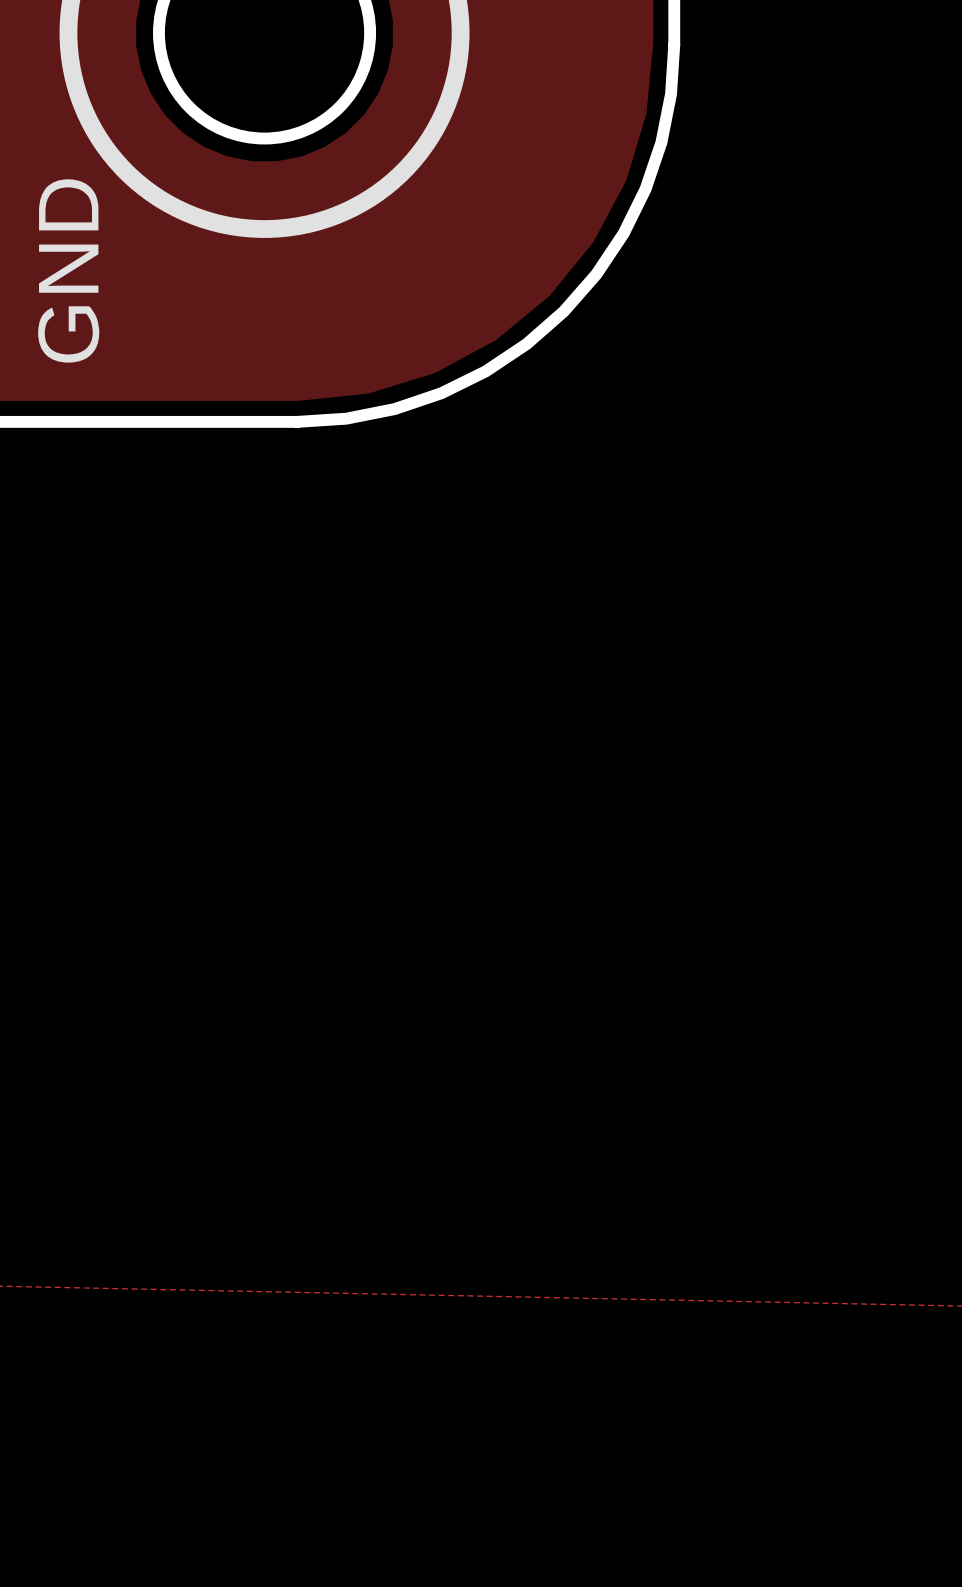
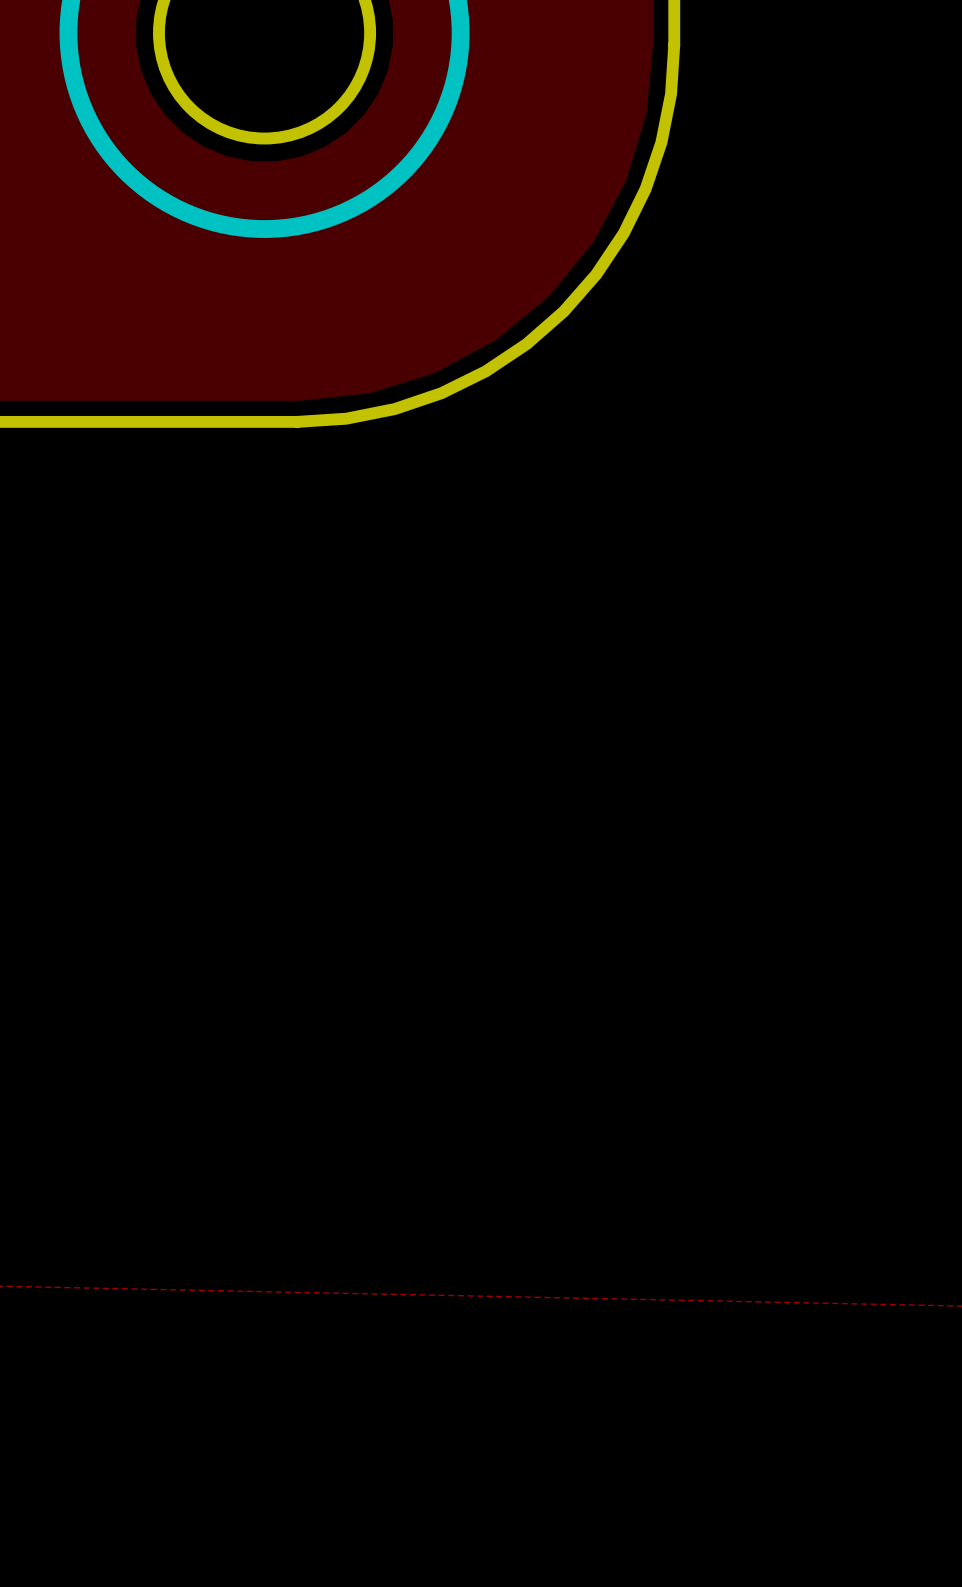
text: GND (68, 270) -> none

